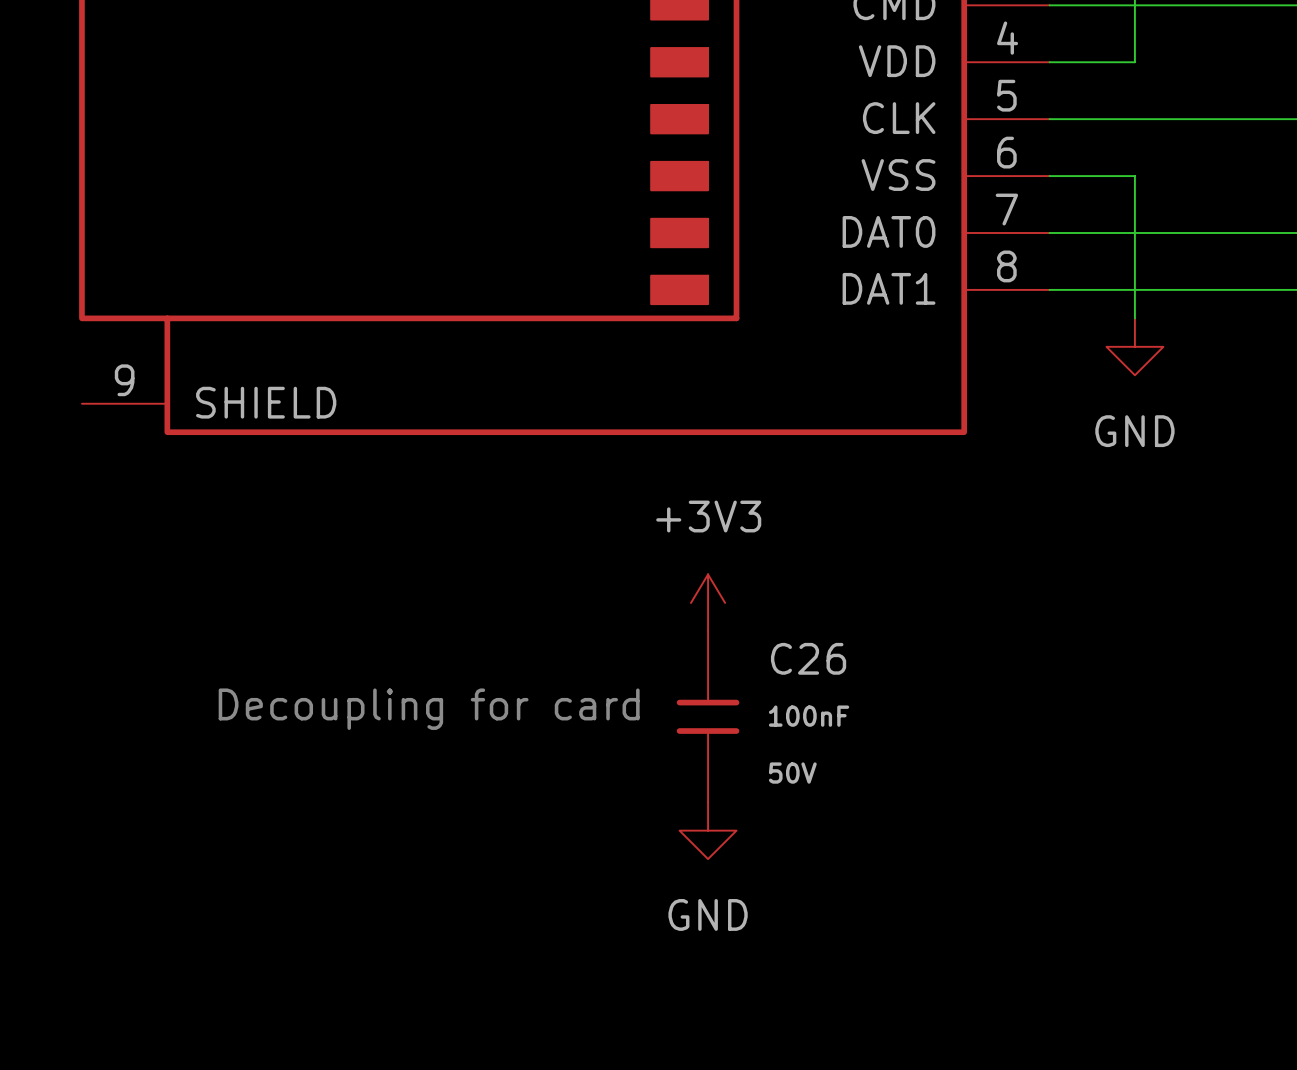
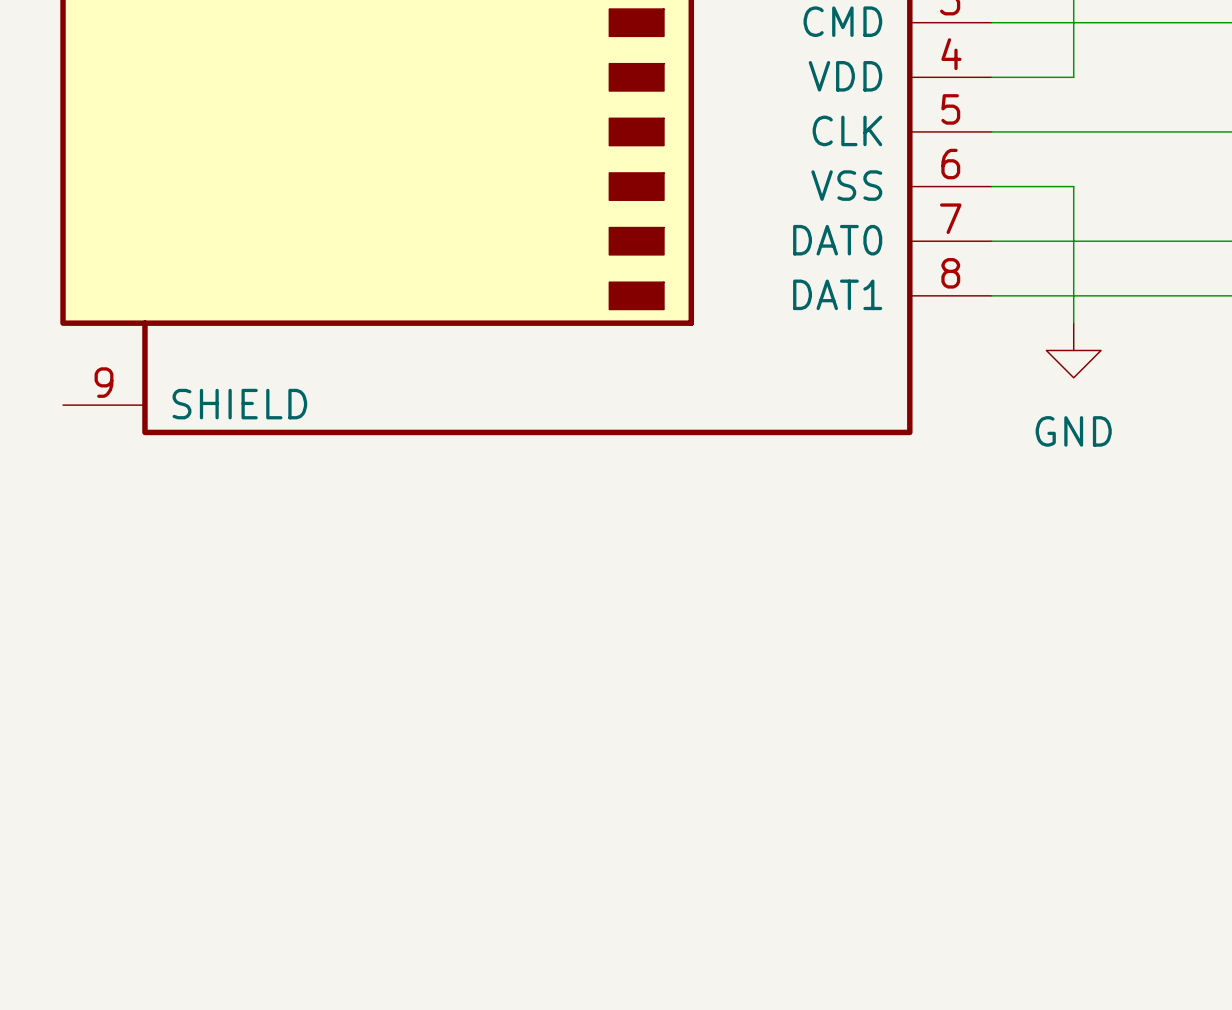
power symbol: +3V3 (708, 602) -> none
text: Decoupling for card (429, 709) -> none
C26: 100nF (708, 716) -> none
power symbol: GND (708, 830) -> none

